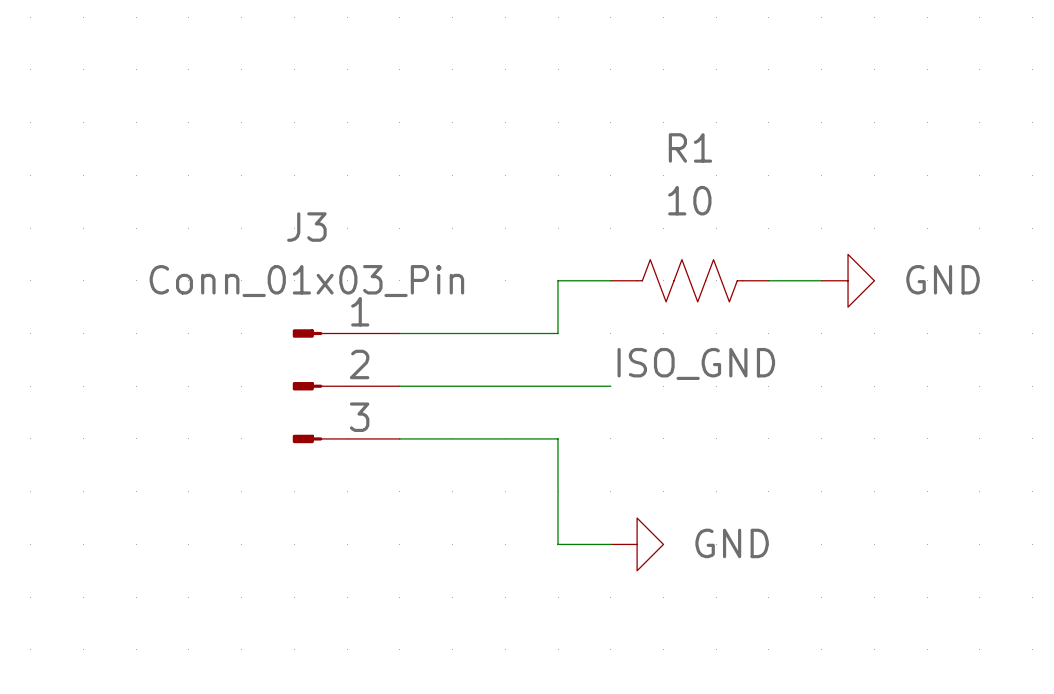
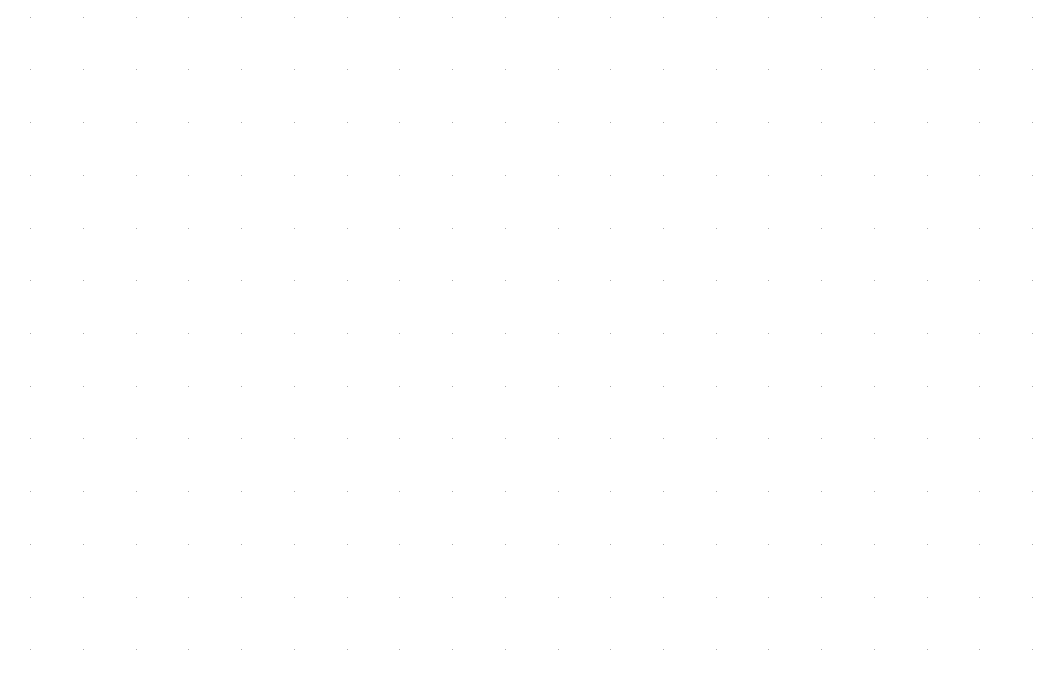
wire: (610, 280) (558, 280) (558, 333) (399, 333) -> none
R1: 10 (689, 280) -> none
wire: (768, 280) (821, 280) -> none
power symbol: GND (848, 280) -> none
label: ISO_GND (696, 363) -> none
J3: Conn_01x03_Pin (346, 386) -> none
wire: (399, 386) (610, 386) -> none
wire: (399, 438) (558, 438) (558, 544) (610, 544) -> none
power symbol: GND (637, 544) -> none

